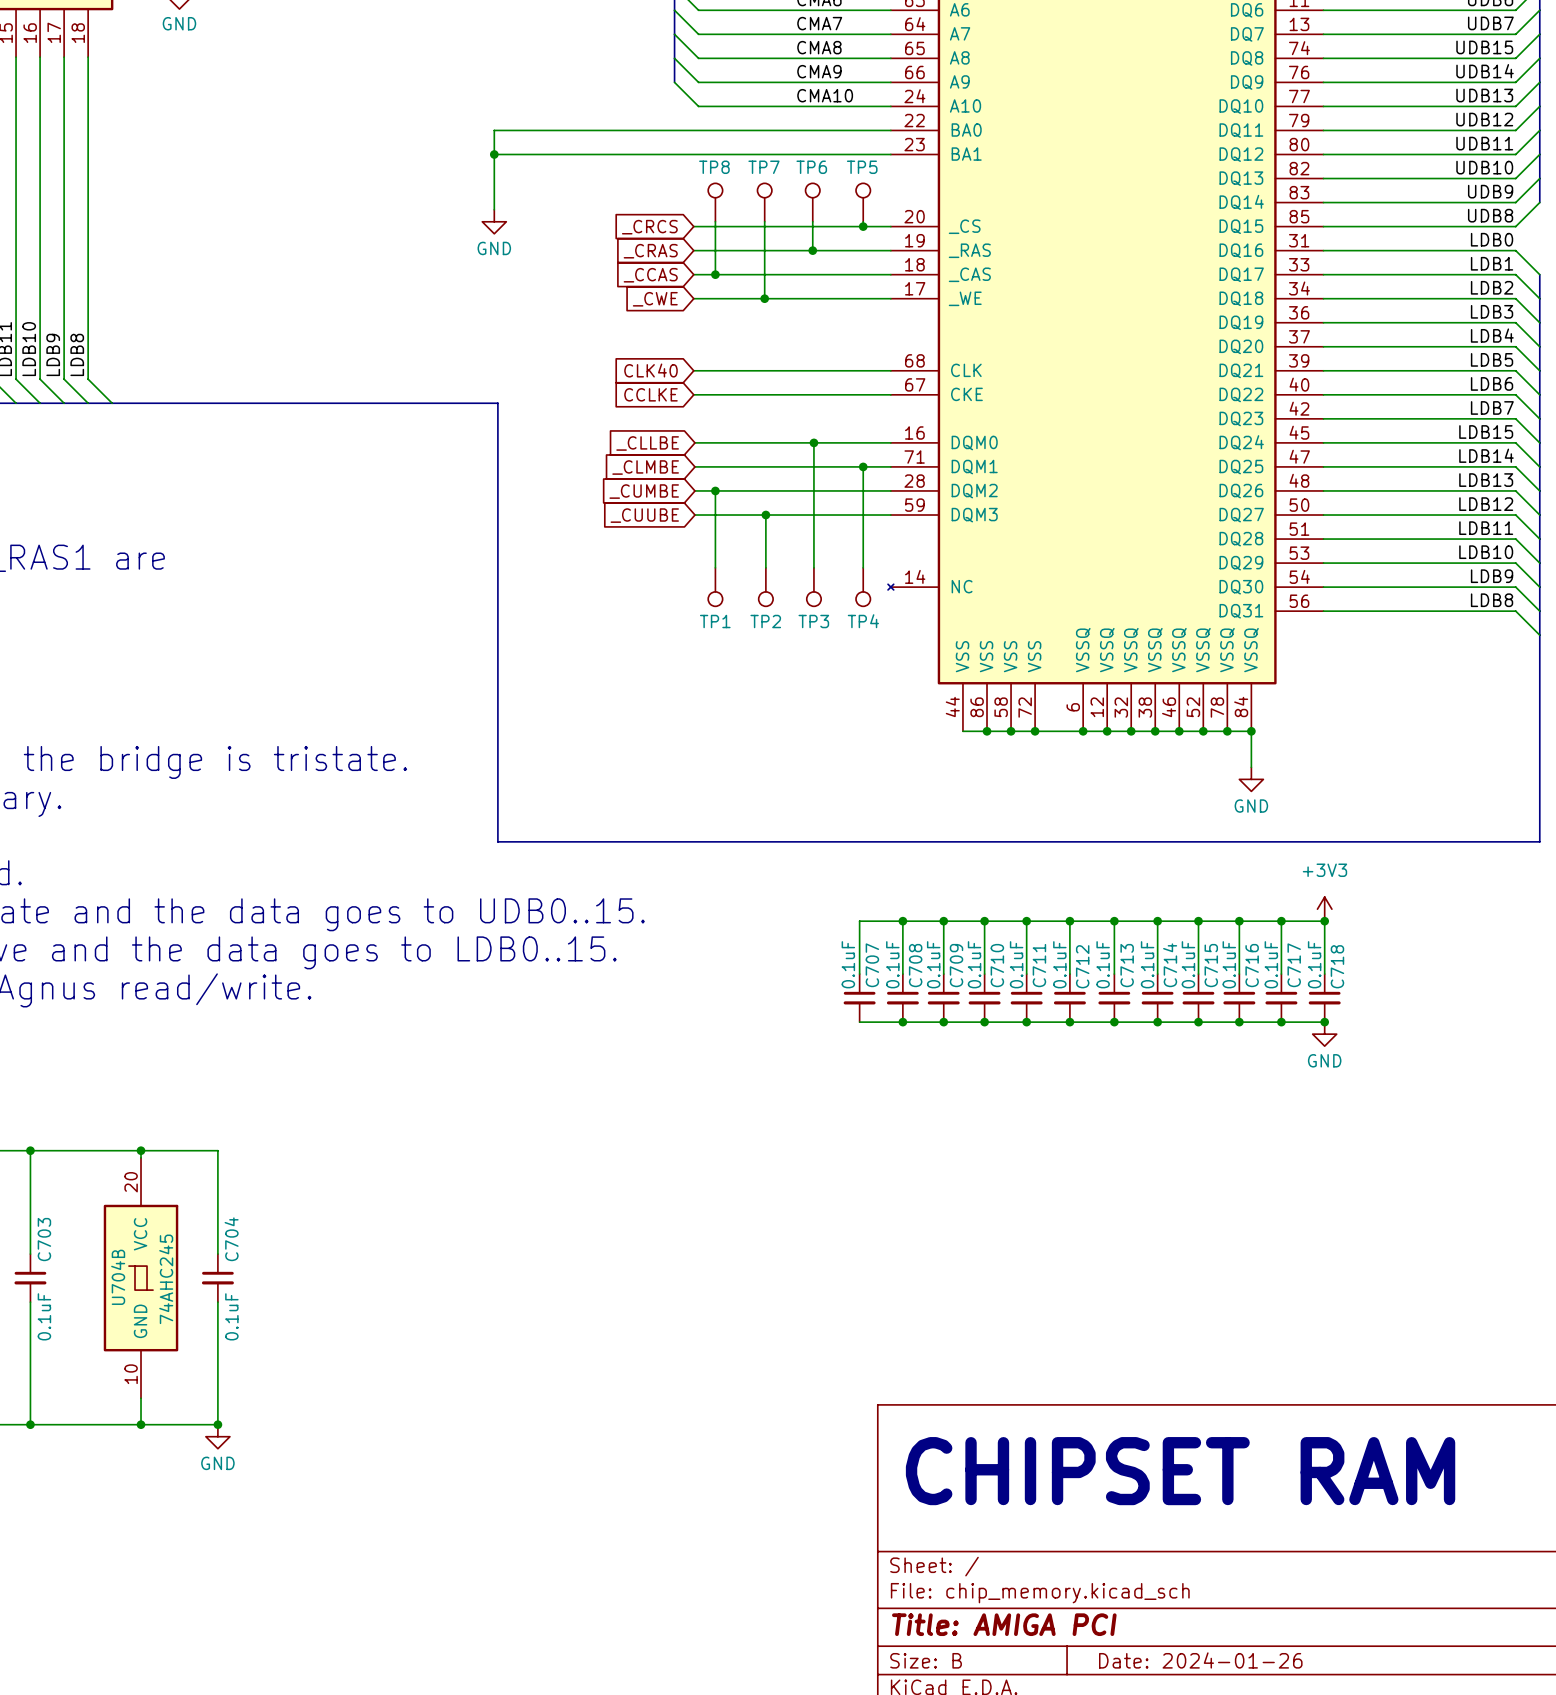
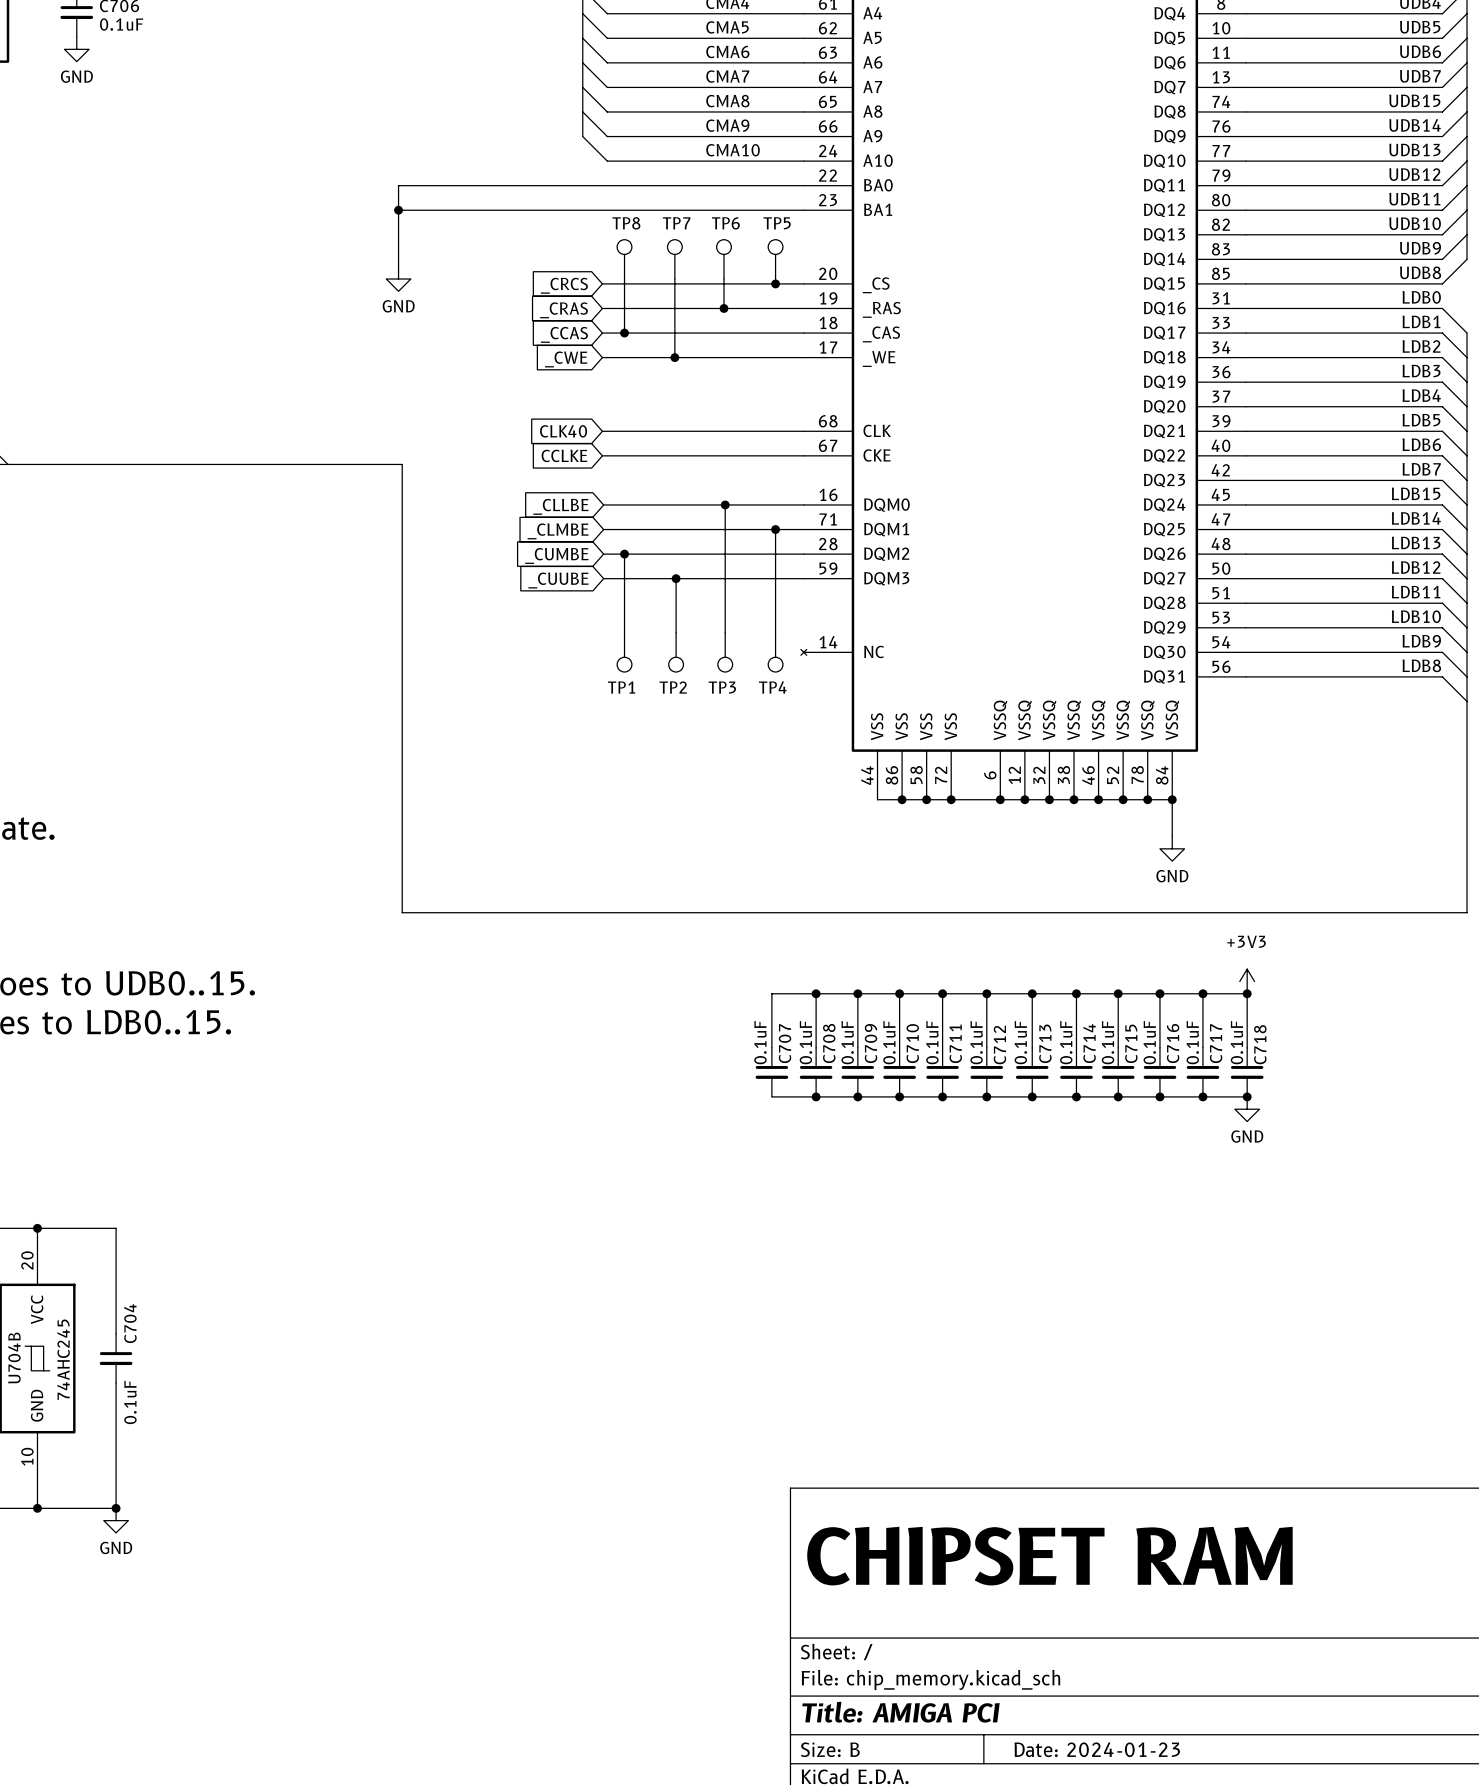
title block: Date: 2024-01-26 (1200, 1660) -> Date: 2024-01-23 (1097, 1749)

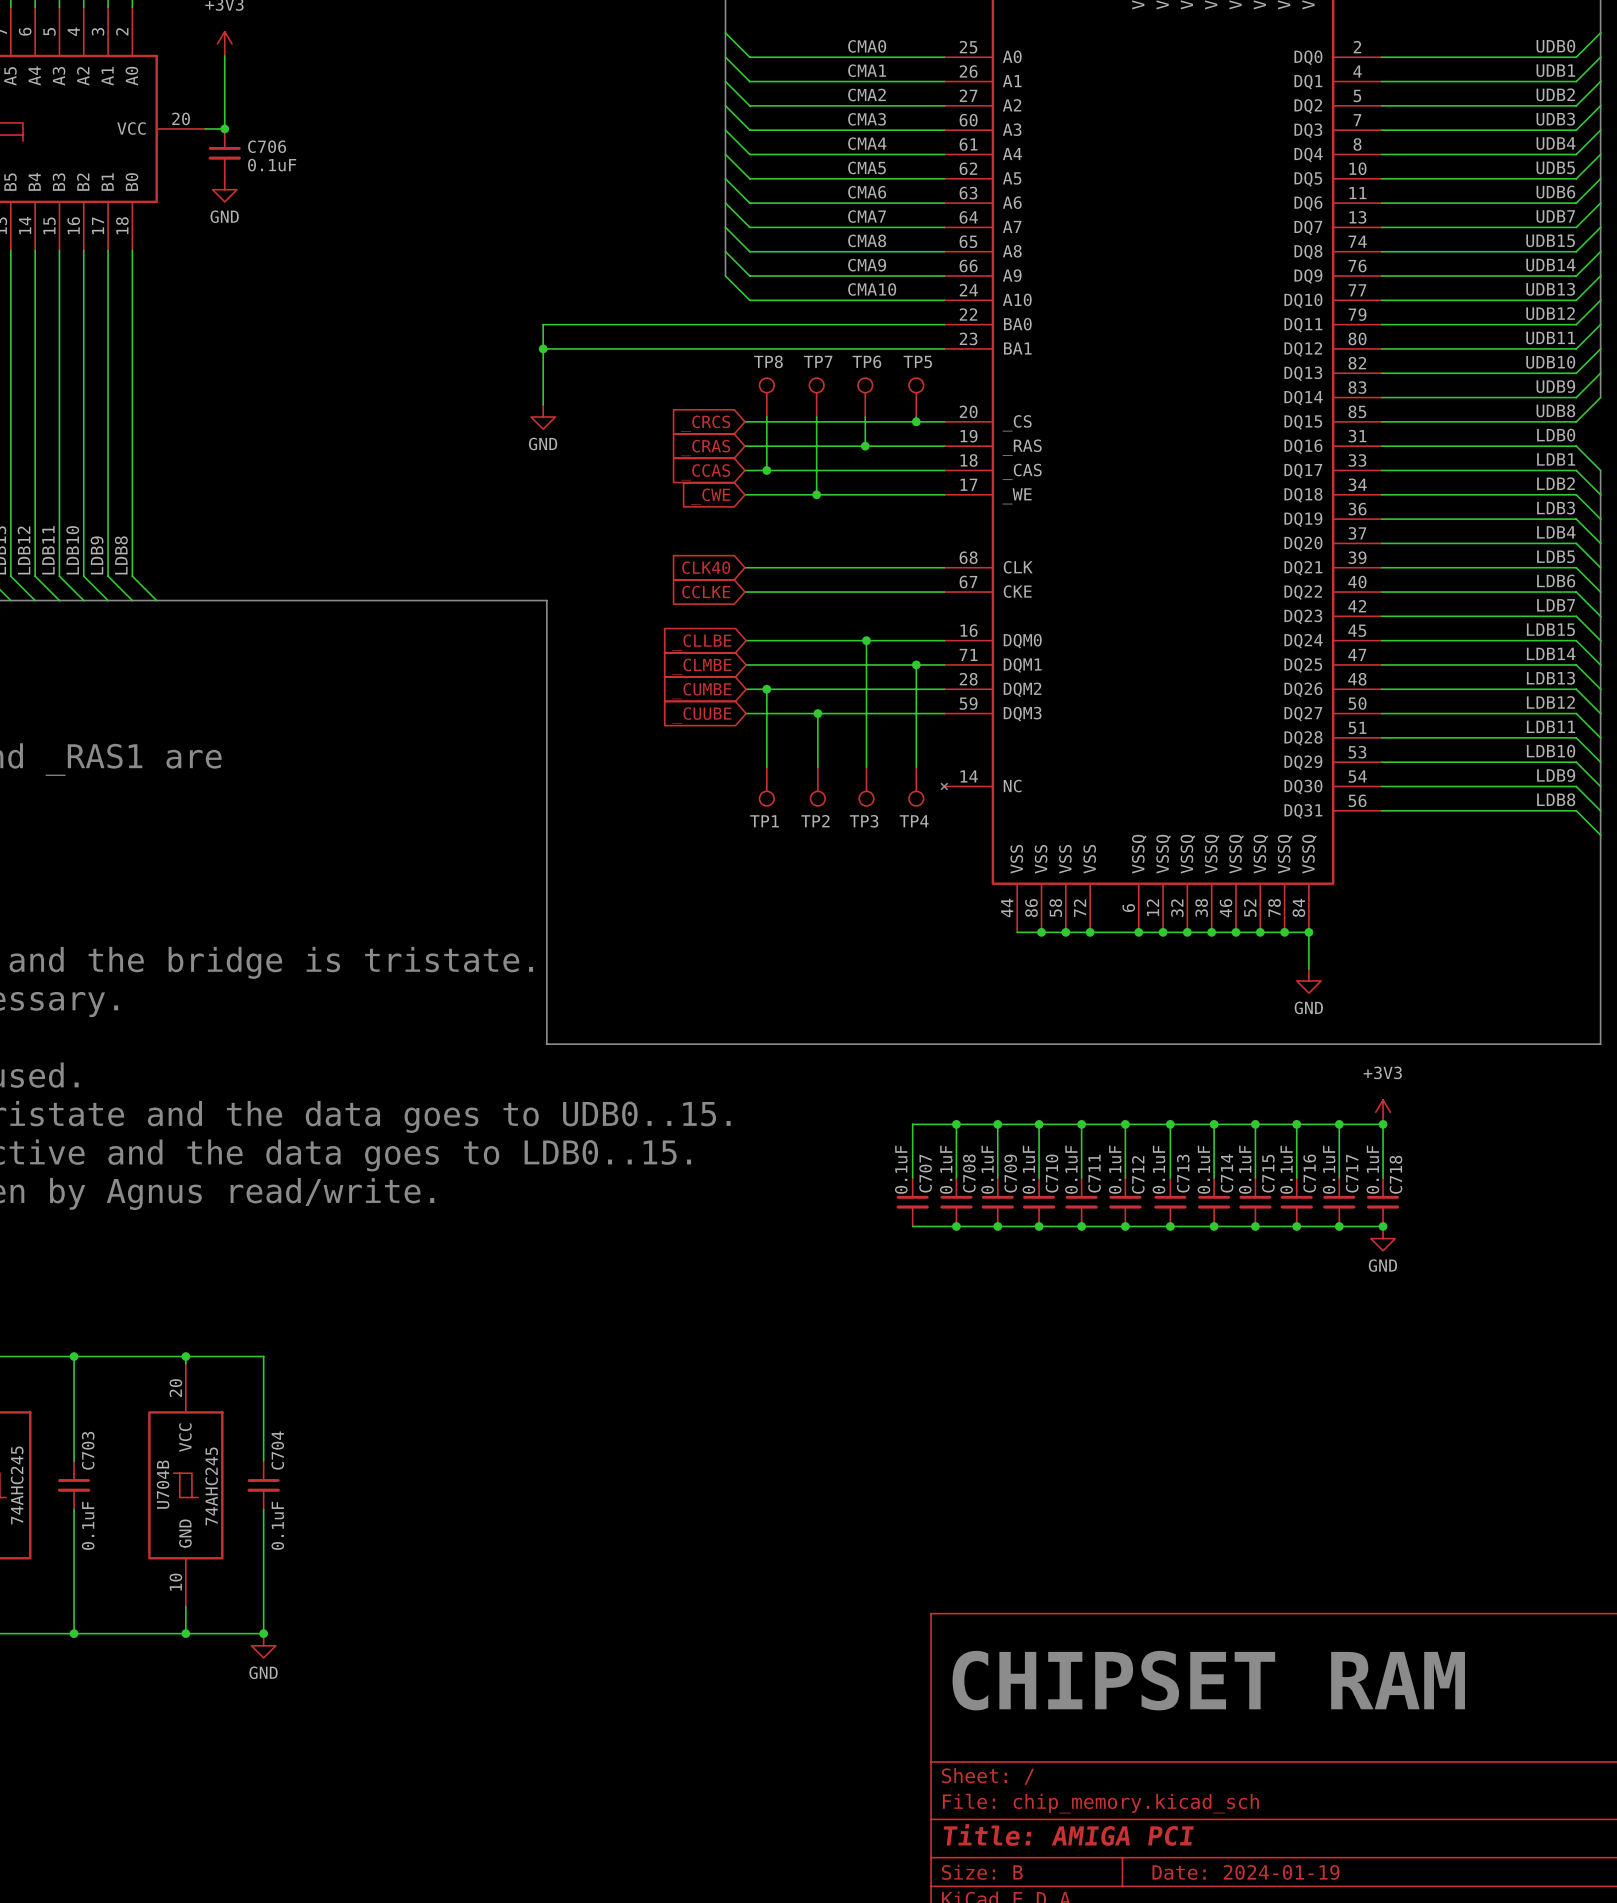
title block: Date: 2024-01-23 (1097, 1749) -> Date: 2024-01-19 (1245, 1872)

